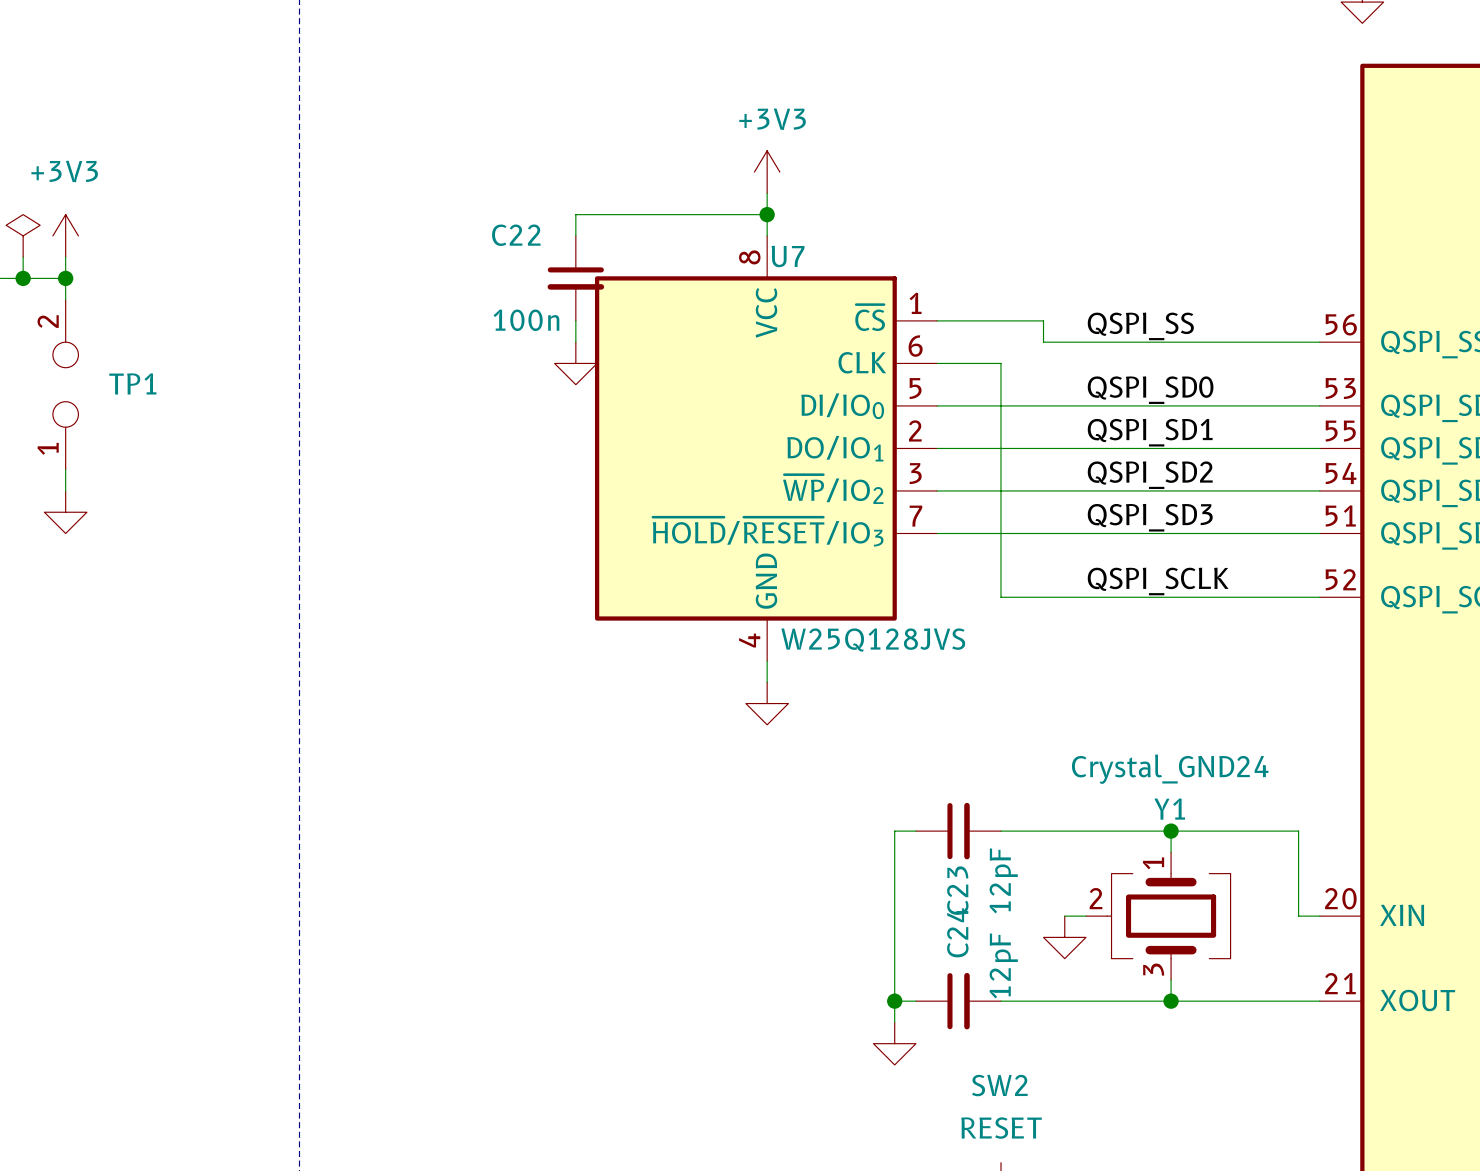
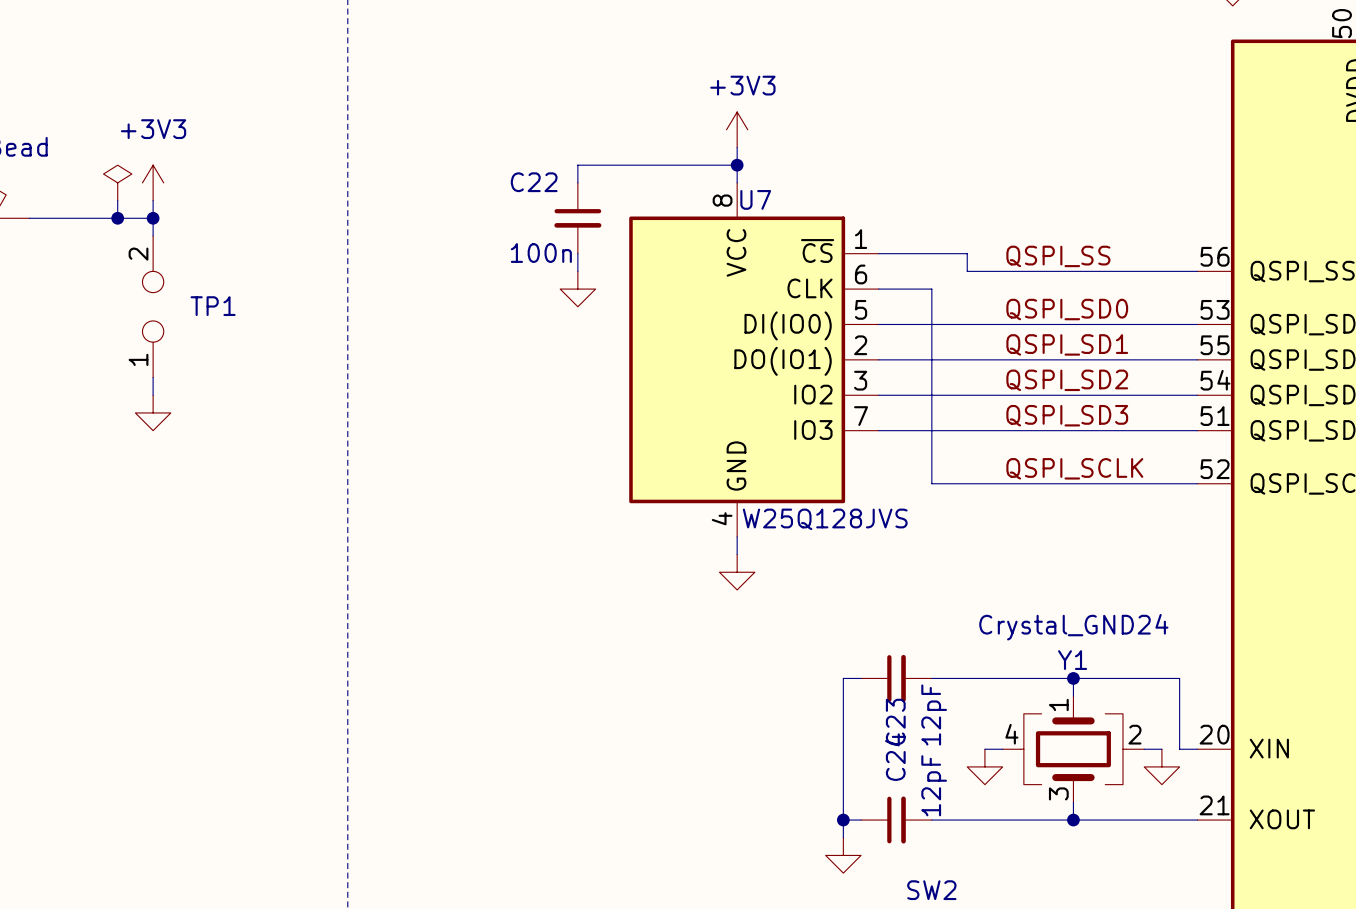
U7 symbol: [594, 235, 938, 662] -> [629, 182, 879, 537]
Y1 symbol: [1086, 852, 1231, 980] -> [1002, 696, 1145, 803]
wire: none -> (1144, 749) (1161, 749)
power symbol: none -> (1161, 766)

